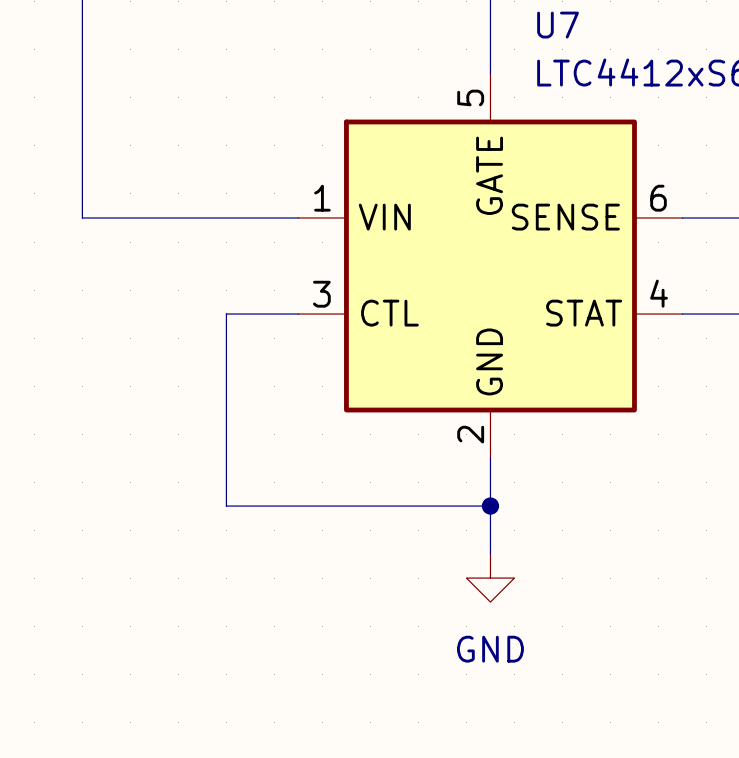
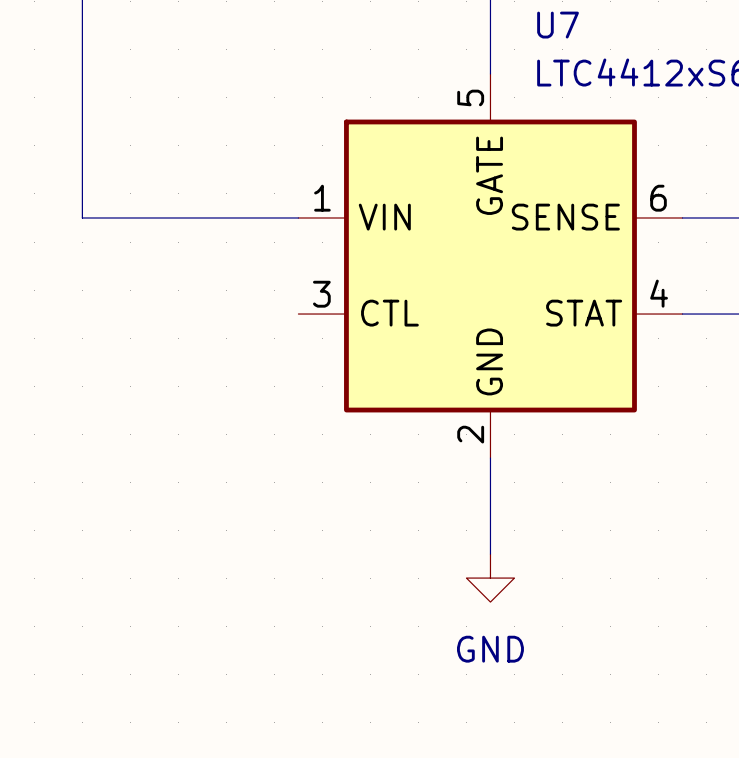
wire: (298, 314) (226, 314) (226, 506) (490, 506) -> none
junction: (490, 506) -> none

